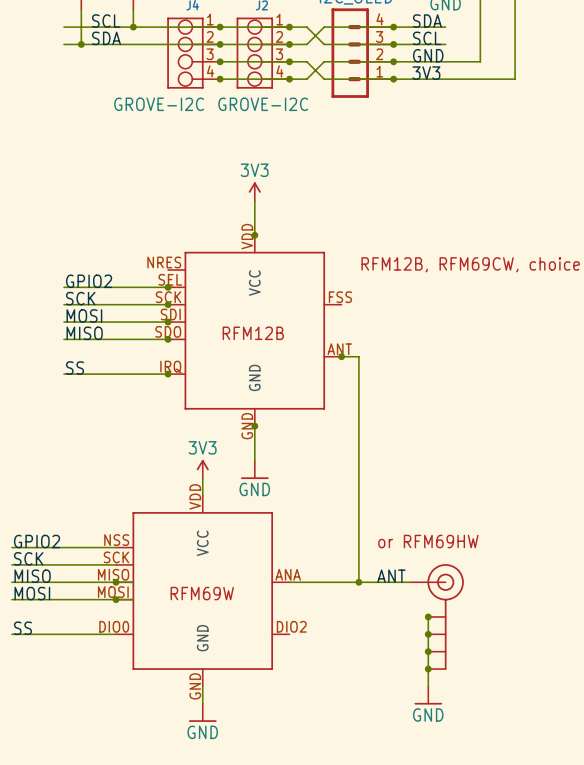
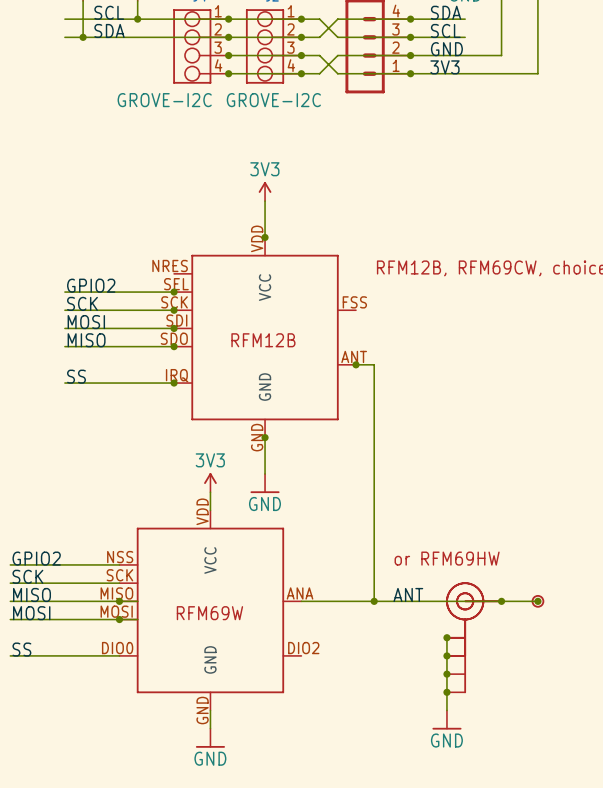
wire: none -> (428, 601) (537, 601)
junction: none -> (501, 601)
part: none -> (537, 601)
junction: none -> (537, 601)
part: none -> (473, 619)
part: (437, 616) -> none
part: none -> (473, 637)

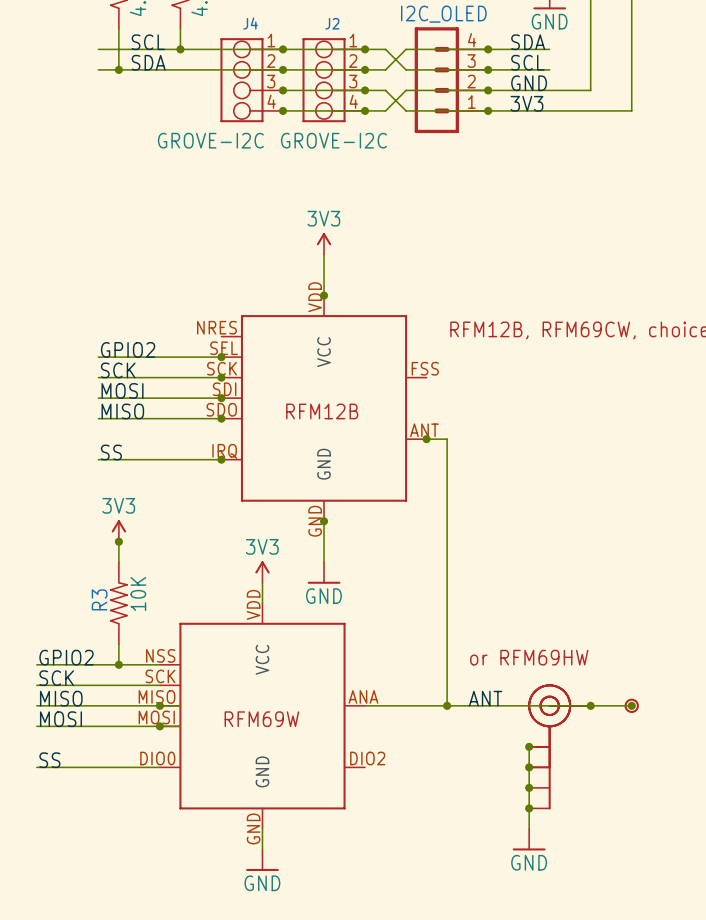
power symbol: none -> 3V3 (118, 530)
wire: none -> (118, 541) (118, 562)
junction: none -> (118, 541)
R3: none -> 10K (118, 603)
wire: none -> (118, 644) (118, 664)
junction: none -> (118, 664)

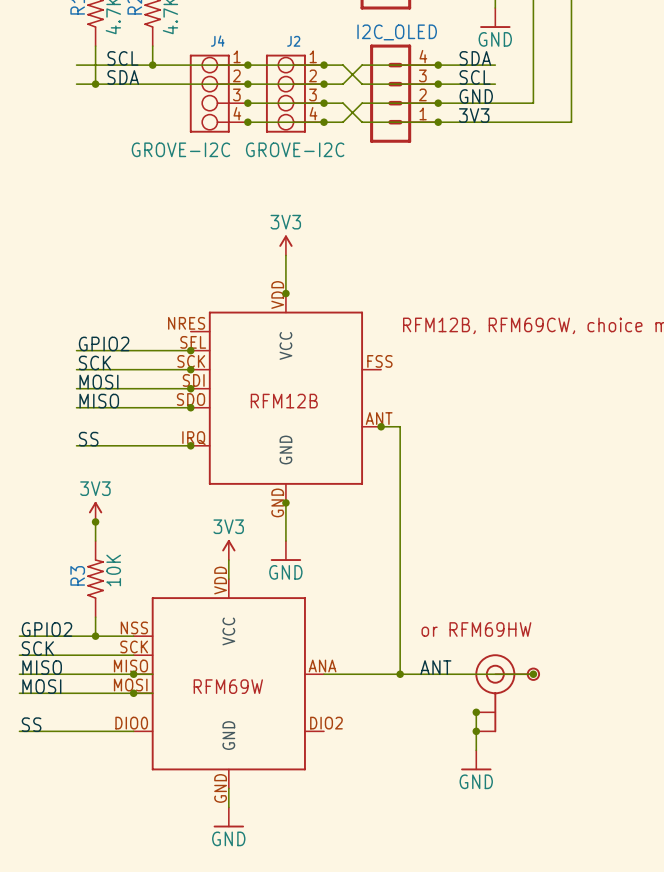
wire: (590, 705) (631, 705) -> none
part position: (631, 705) -> (533, 674)
junction: (631, 705) -> none
part: (559, 746) -> none
junction: (529, 787) -> none
junction: (529, 808) -> none
power symbol position: GND (529, 839) -> GND (476, 760)

